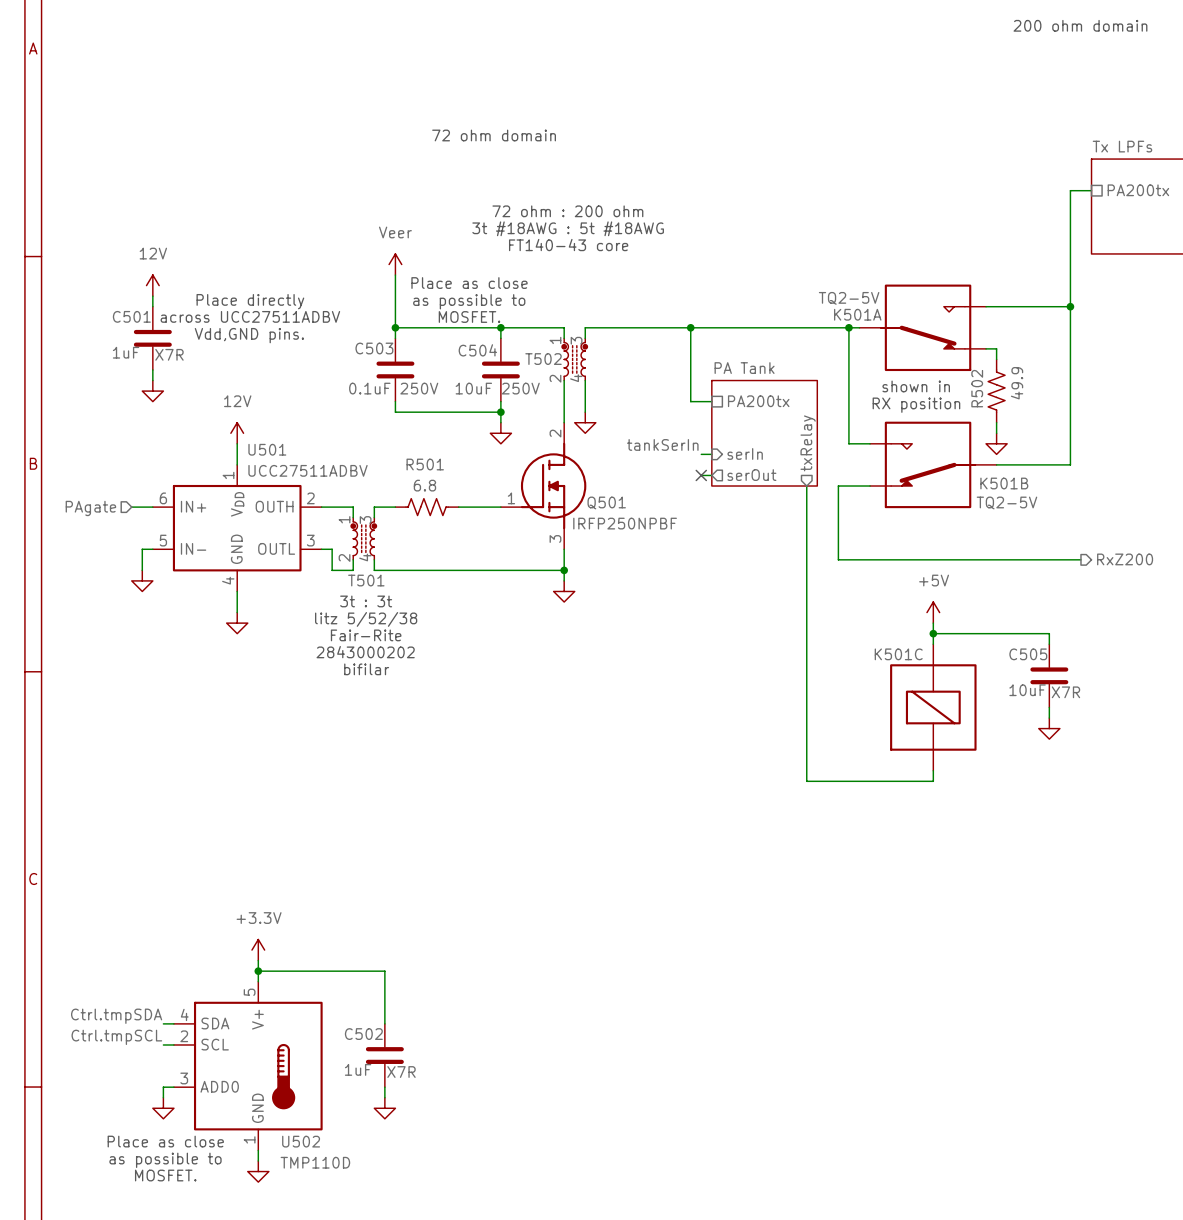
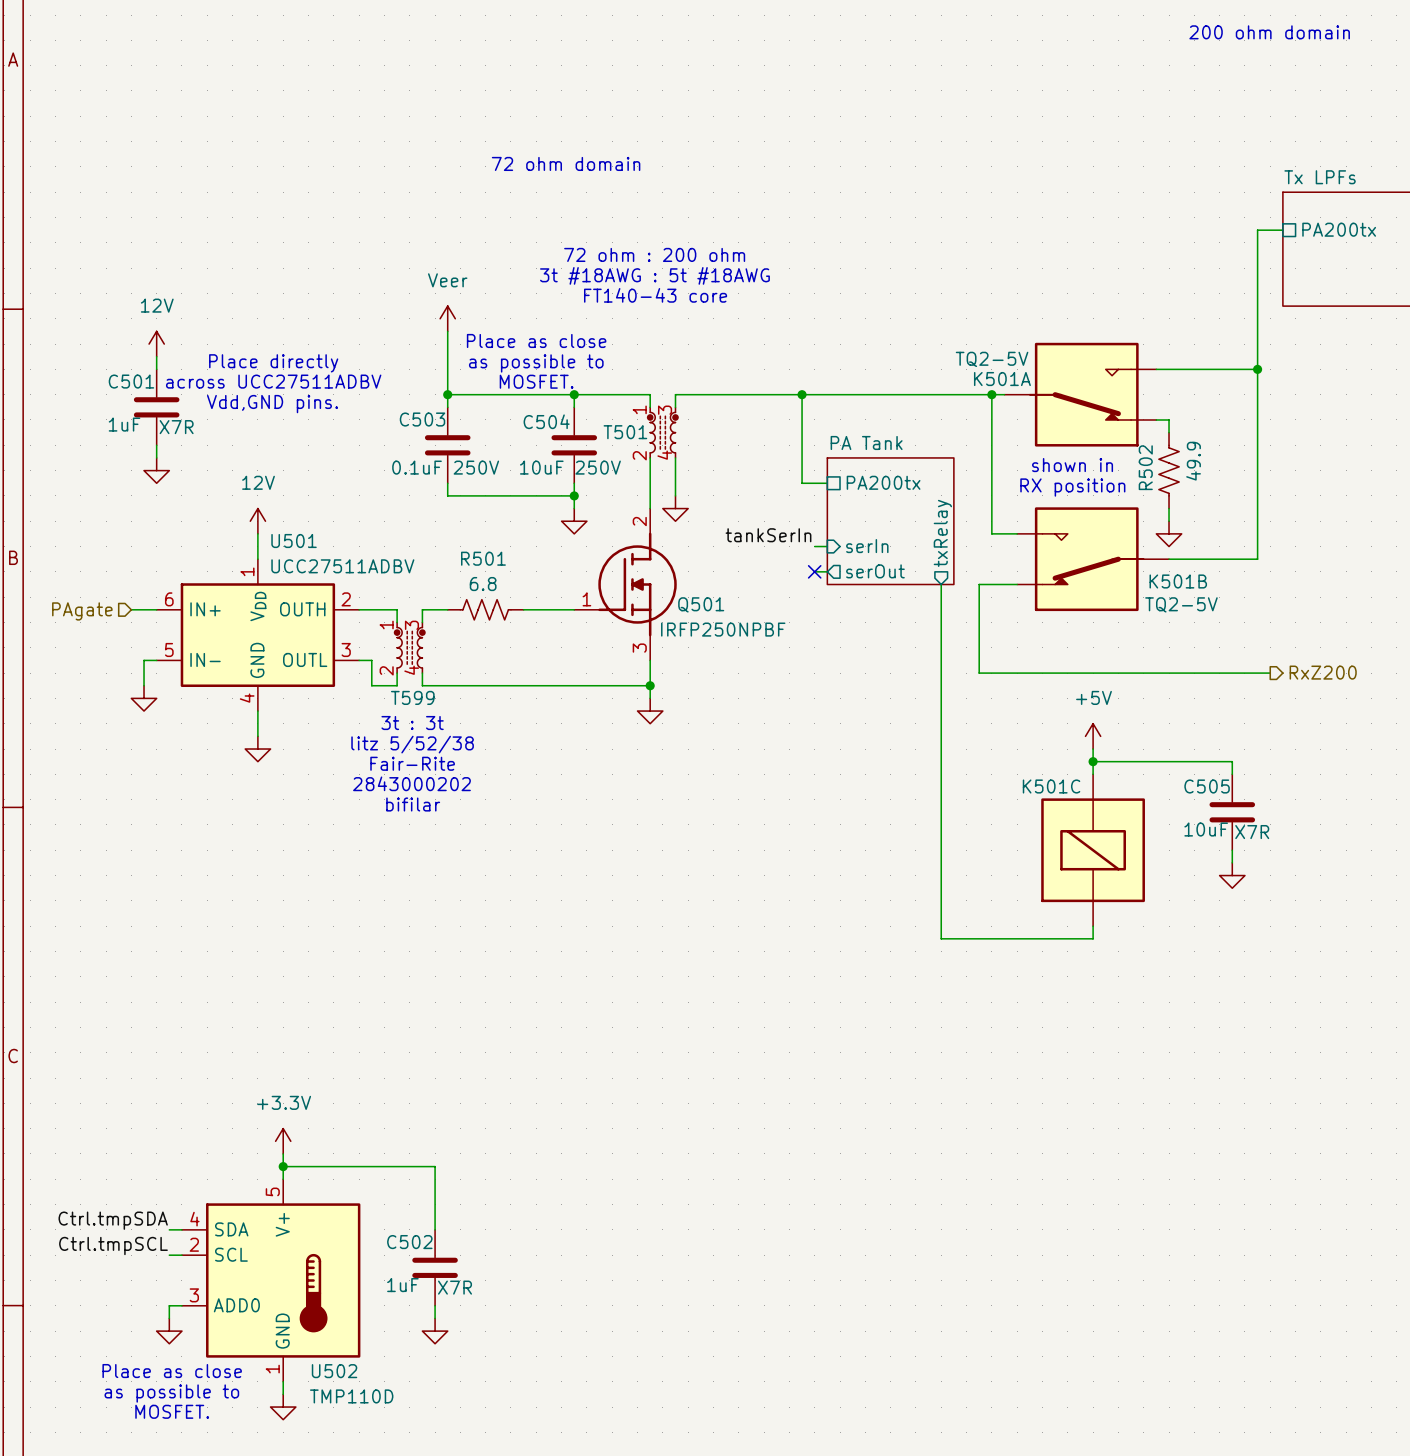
T502 name: T502 (543, 359) -> T501 (625, 432)
T501 name: T501 (366, 580) -> T599 (412, 697)

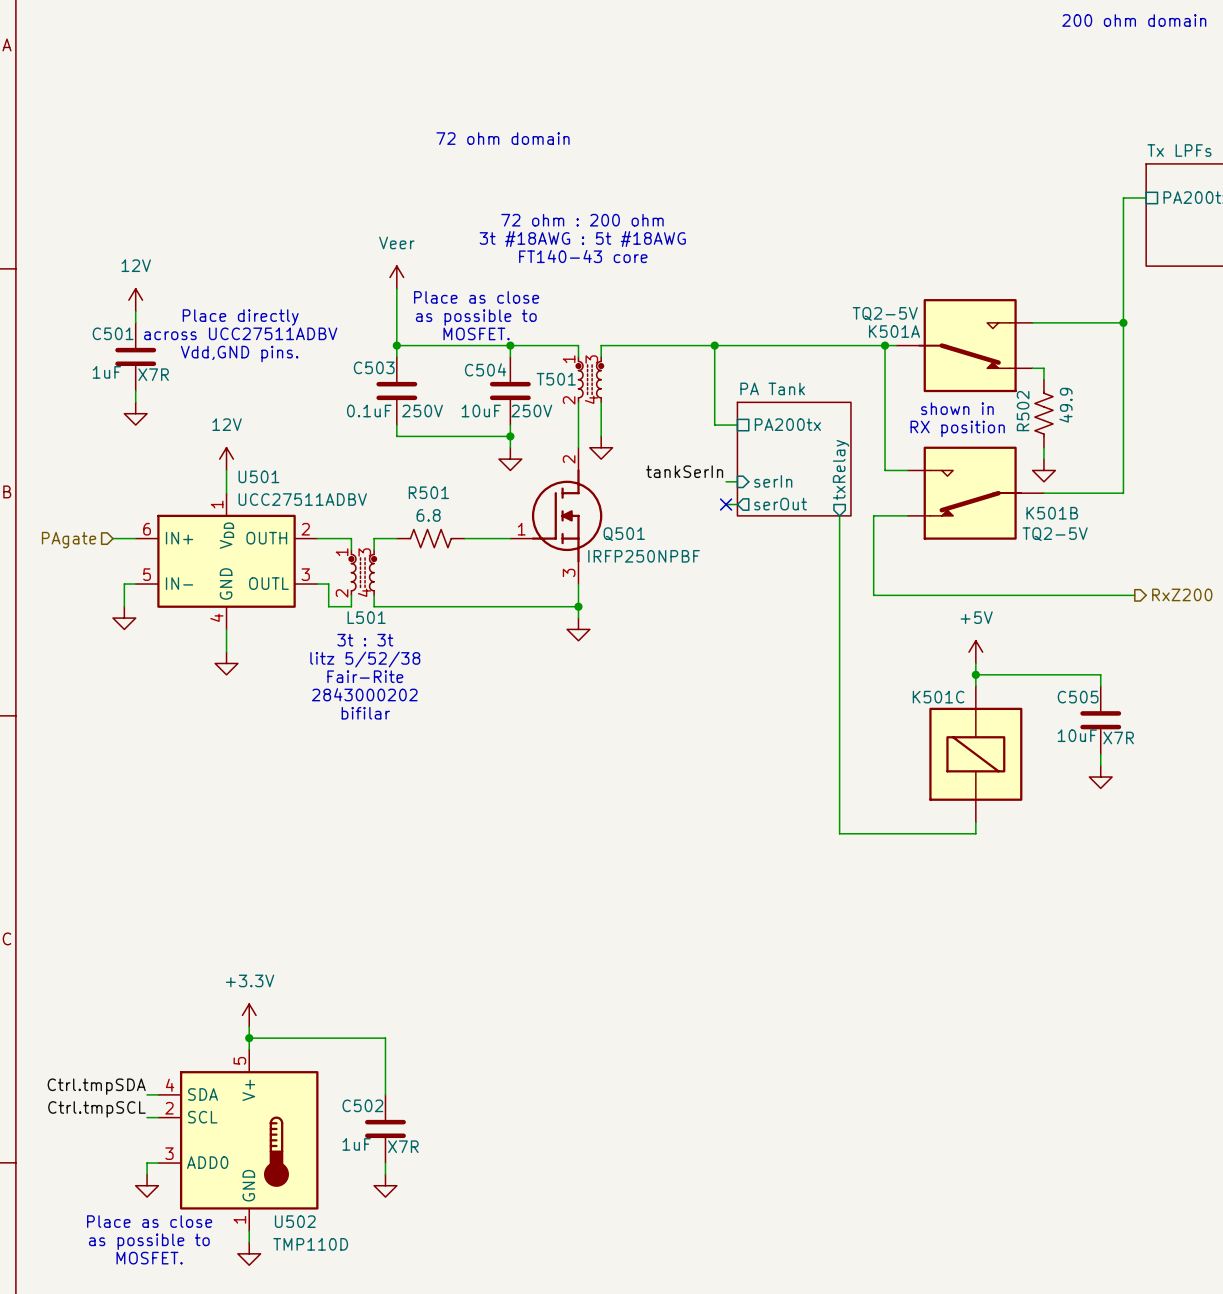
T599 name: T599 (412, 697) -> L501 (366, 617)

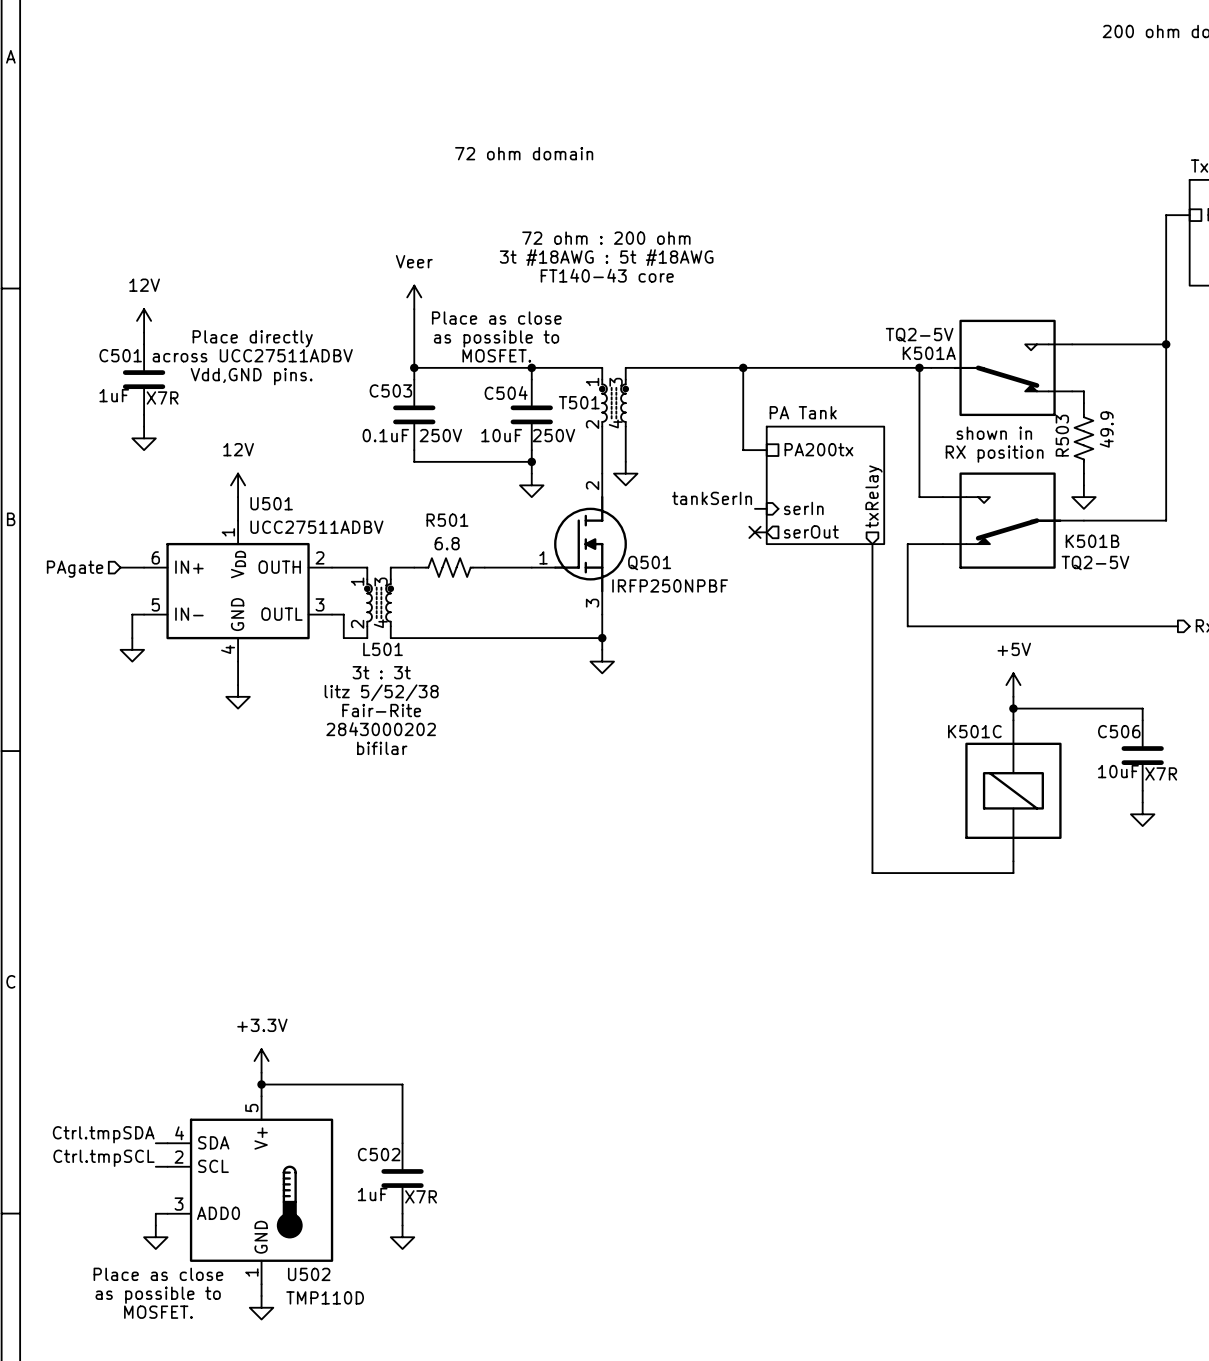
R502 name: R502 (1023, 411) -> R503 (1062, 435)
C505 name: C505 (1078, 697) -> C506 (1119, 731)

